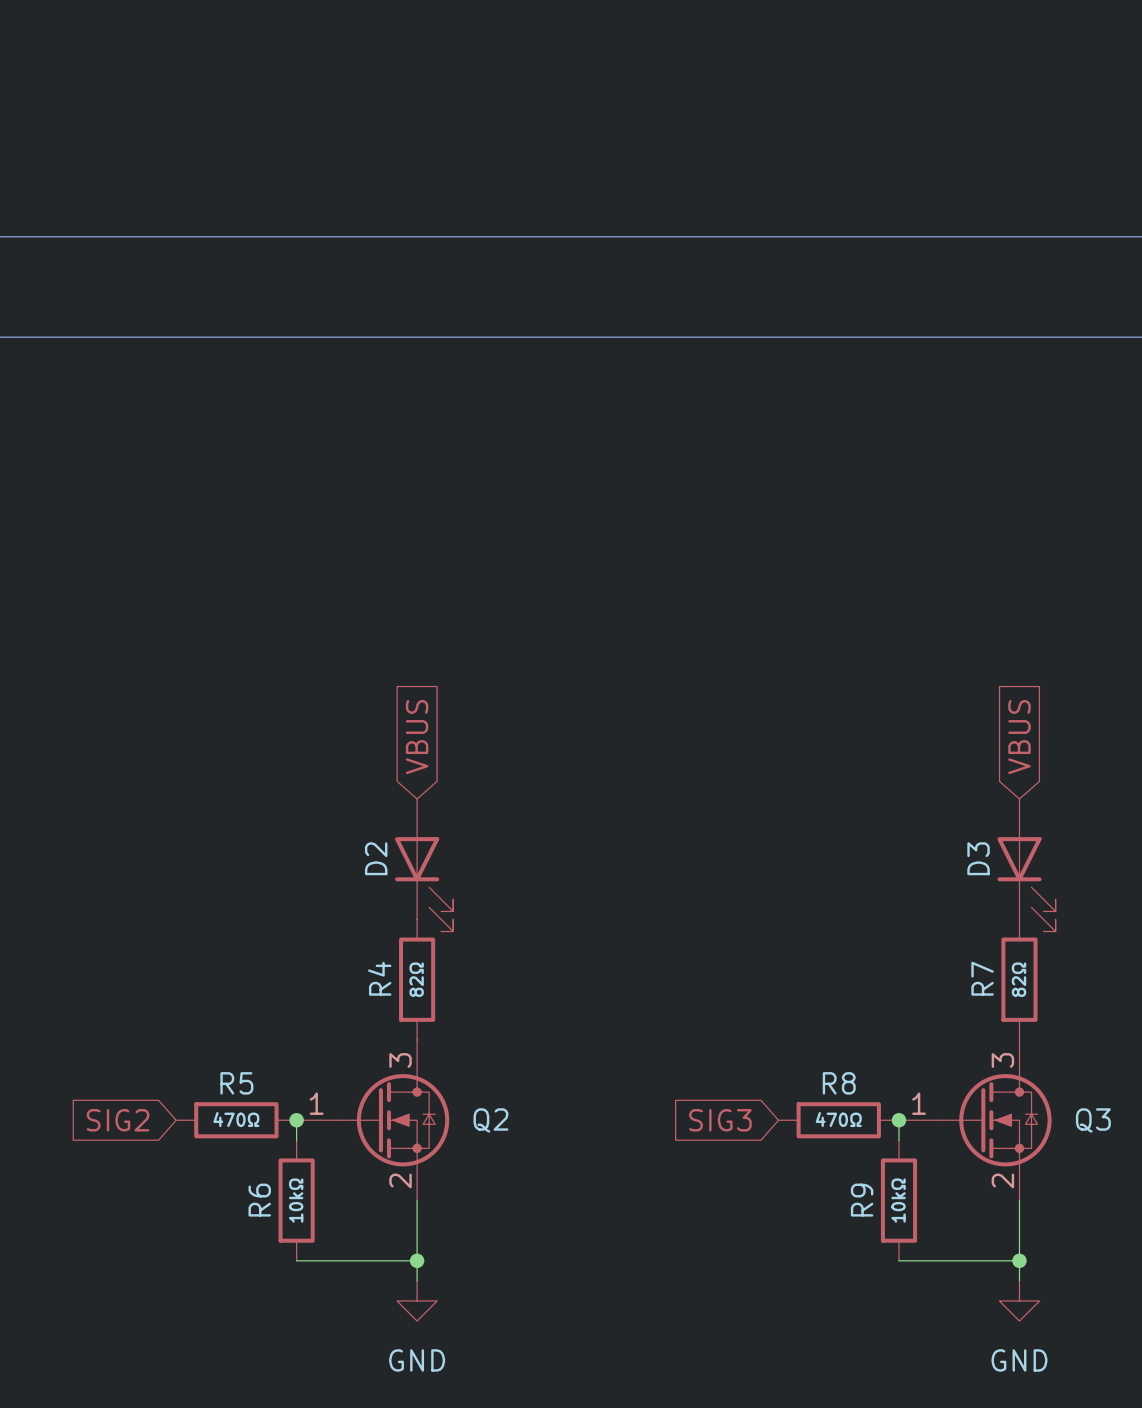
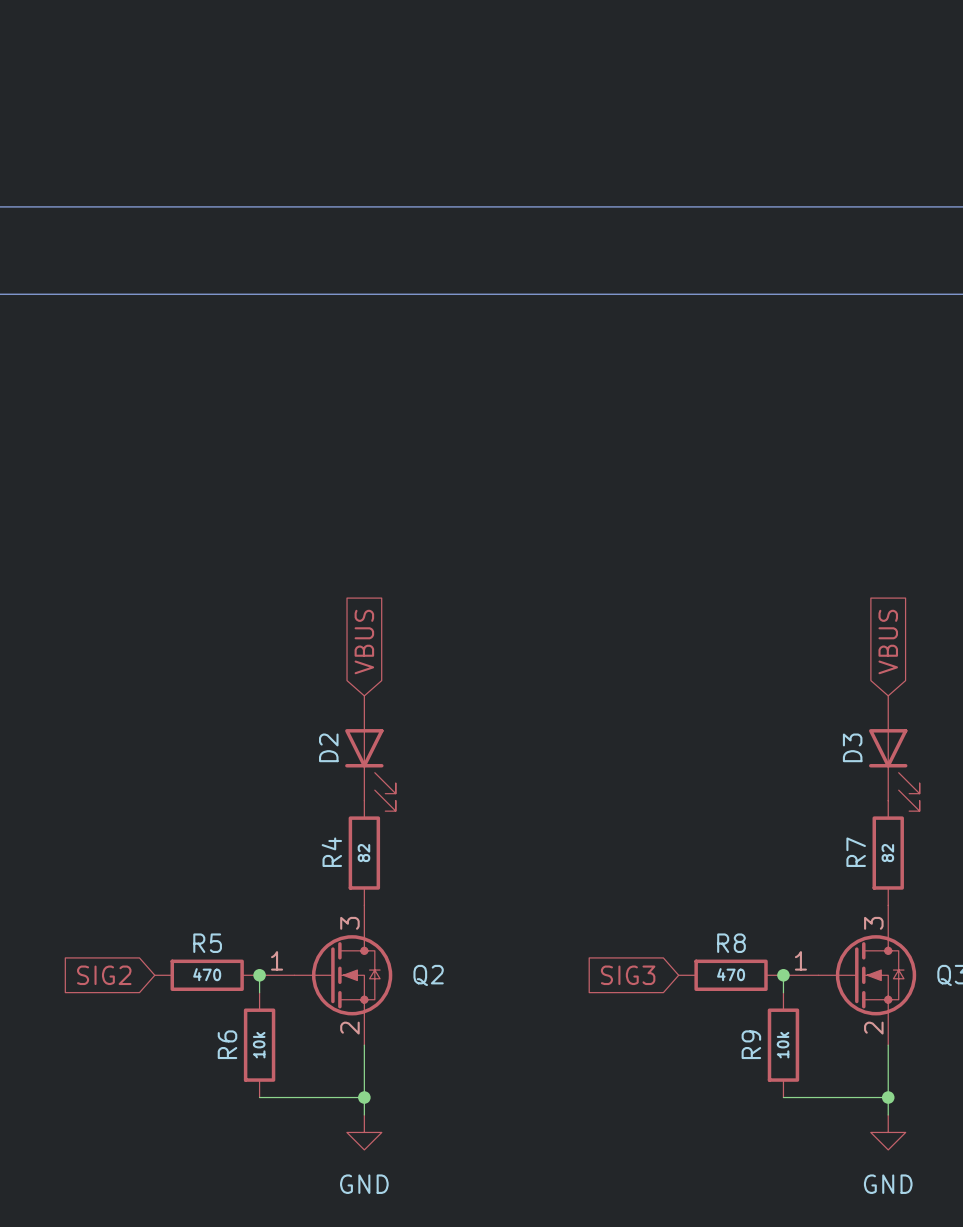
R4 value: 82Ω (416, 979) -> 82 (363, 853)
R7 value: 82Ω (1019, 979) -> 82 (887, 853)
R5 value: 470Ω (236, 1119) -> 470 (207, 974)
R8 value: 470Ω (838, 1119) -> 470 (731, 974)
R6 value: 10kΩ (296, 1200) -> 10k (259, 1045)
R9 value: 10kΩ (898, 1200) -> 10k (783, 1045)

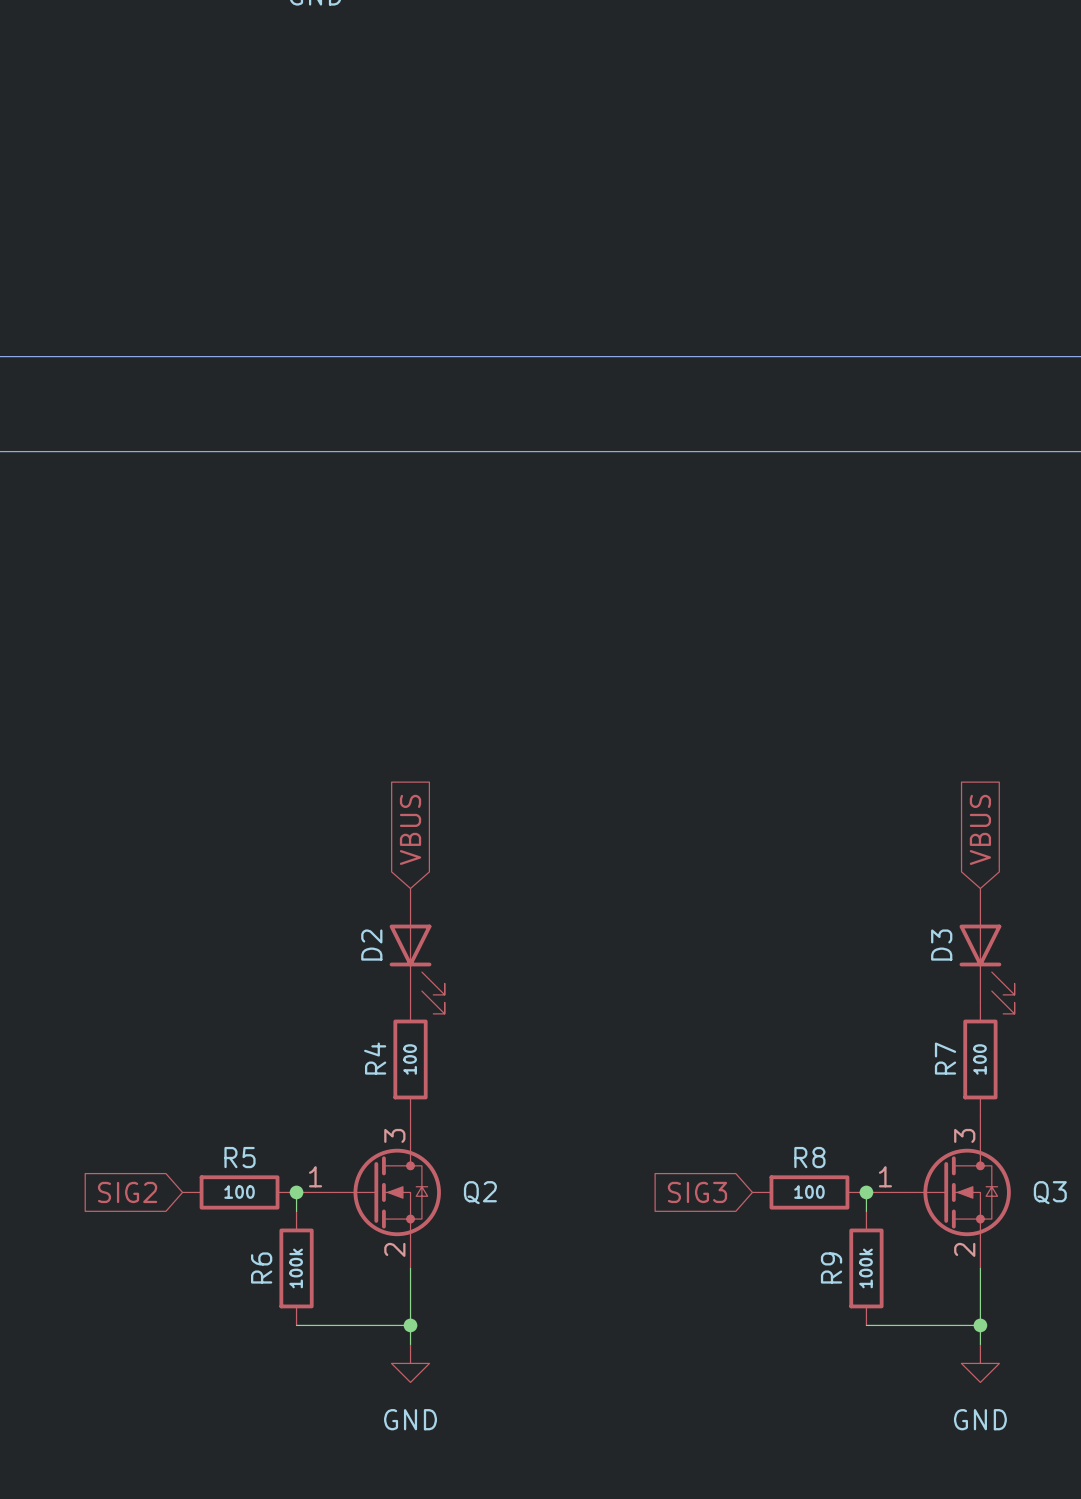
R4 value: 82 (363, 853) -> 100 (410, 1059)
R7 value: 82 (887, 853) -> 100 (979, 1059)
R5 value: 470 (207, 974) -> 100 (239, 1192)
R8 value: 470 (731, 974) -> 100 (809, 1192)
R6 value: 10k (259, 1045) -> 100k (296, 1268)
R9 value: 10k (783, 1045) -> 100k (866, 1268)

